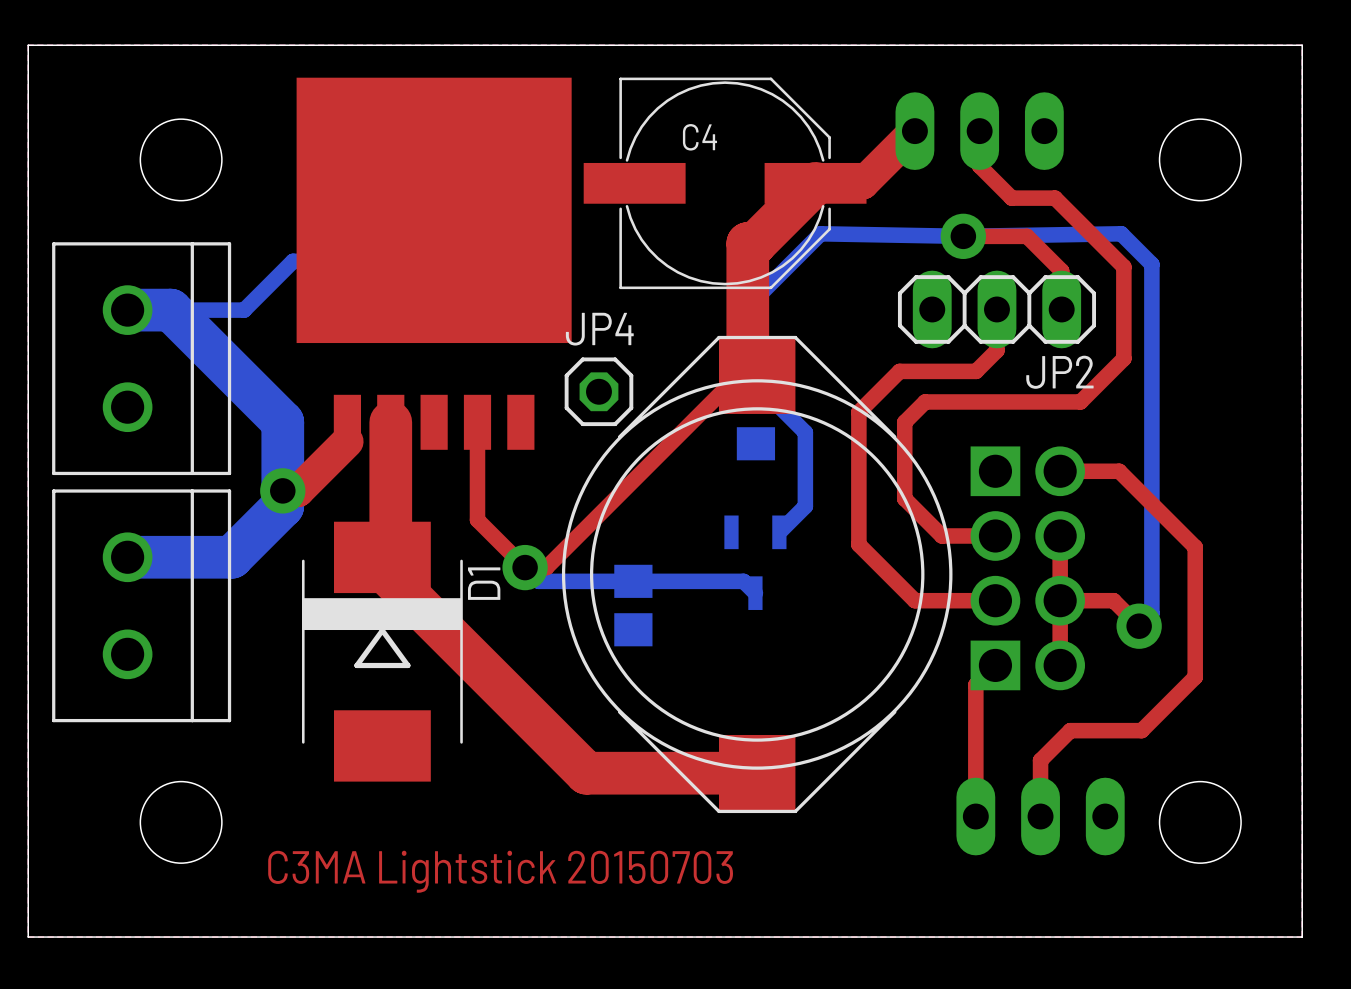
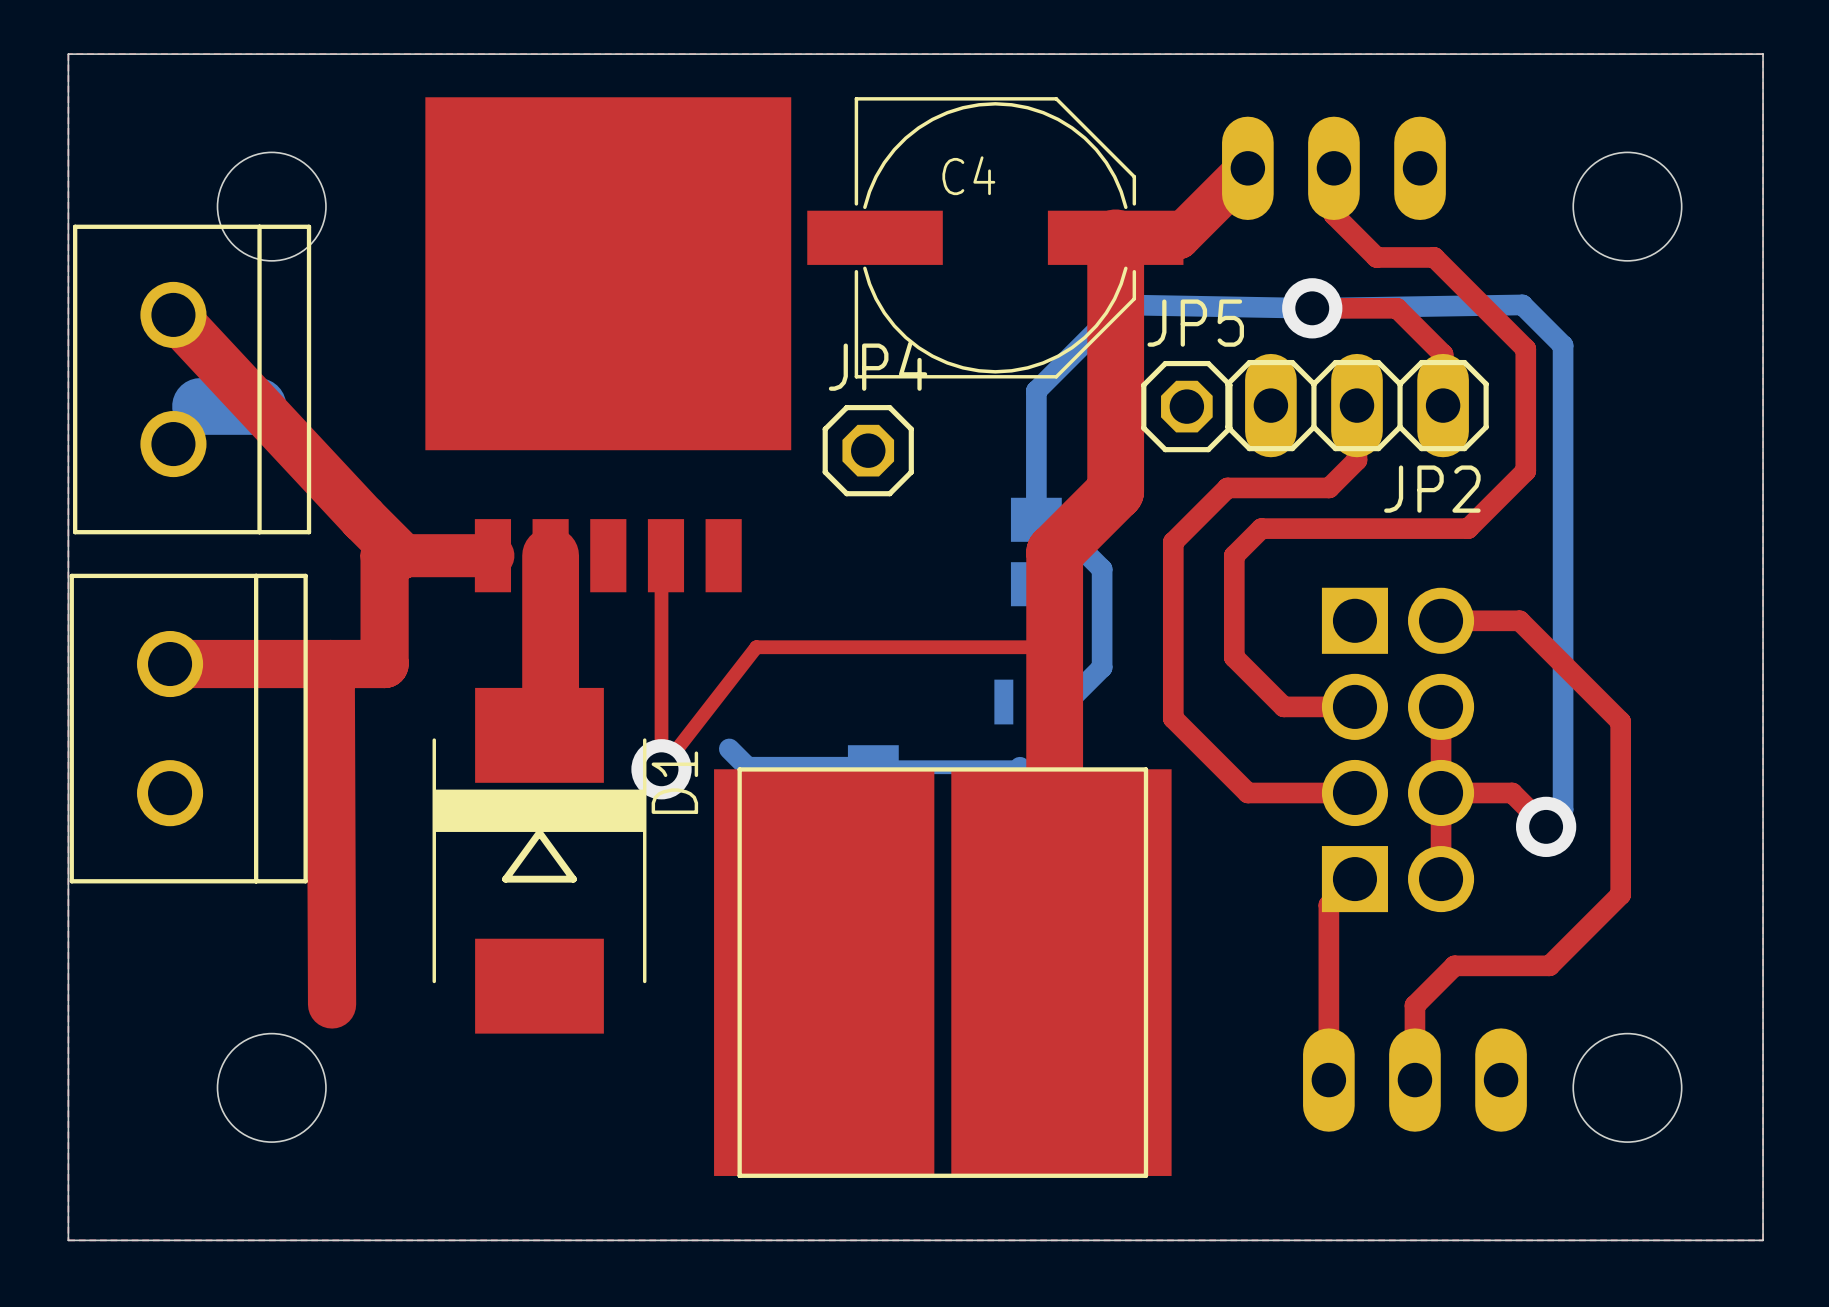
top track: (815, 183) (755, 243) (747, 243) (747, 366) -> (1115, 237) (1115, 491) (1054, 552) (1054, 965)
top track: none -> (173, 314) (363, 518) (400, 555)
bottom track: (404, 261) (292, 261) (244, 310) (170, 310) (282, 422) (282, 506) (231, 557) (127, 557) -> none
JP5: none -> (1186, 406)
part position: (141, 358) -> (192, 379)
top track: (747, 366) (546, 567) (525, 567) (477, 519) (477, 422) -> (1054, 965) (1054, 647) (756, 647) (661, 769) (661, 555) (665, 555)
JP4 position: (598, 391) -> (868, 450)
top track: none -> (400, 555) (384, 555) (384, 664) (170, 664)
top track: (347, 422) (347, 441) (298, 490) (282, 490) -> (492, 555) (400, 555)
via: (282, 490) -> none
top track: none -> (330, 664) (332, 1004)
top track: (382, 557) (382, 569) (586, 773) (757, 773) -> none
via position: (525, 567) -> (661, 769)
part: (757, 574) -> none
bottom track width: thick (633, 581) (743, 581) -> thin (873, 767) (1019, 767)
part position: (141, 605) -> (188, 728)
part: none -> (942, 972)
text: C3MA Lightstick 20150703 (500, 871) -> none

